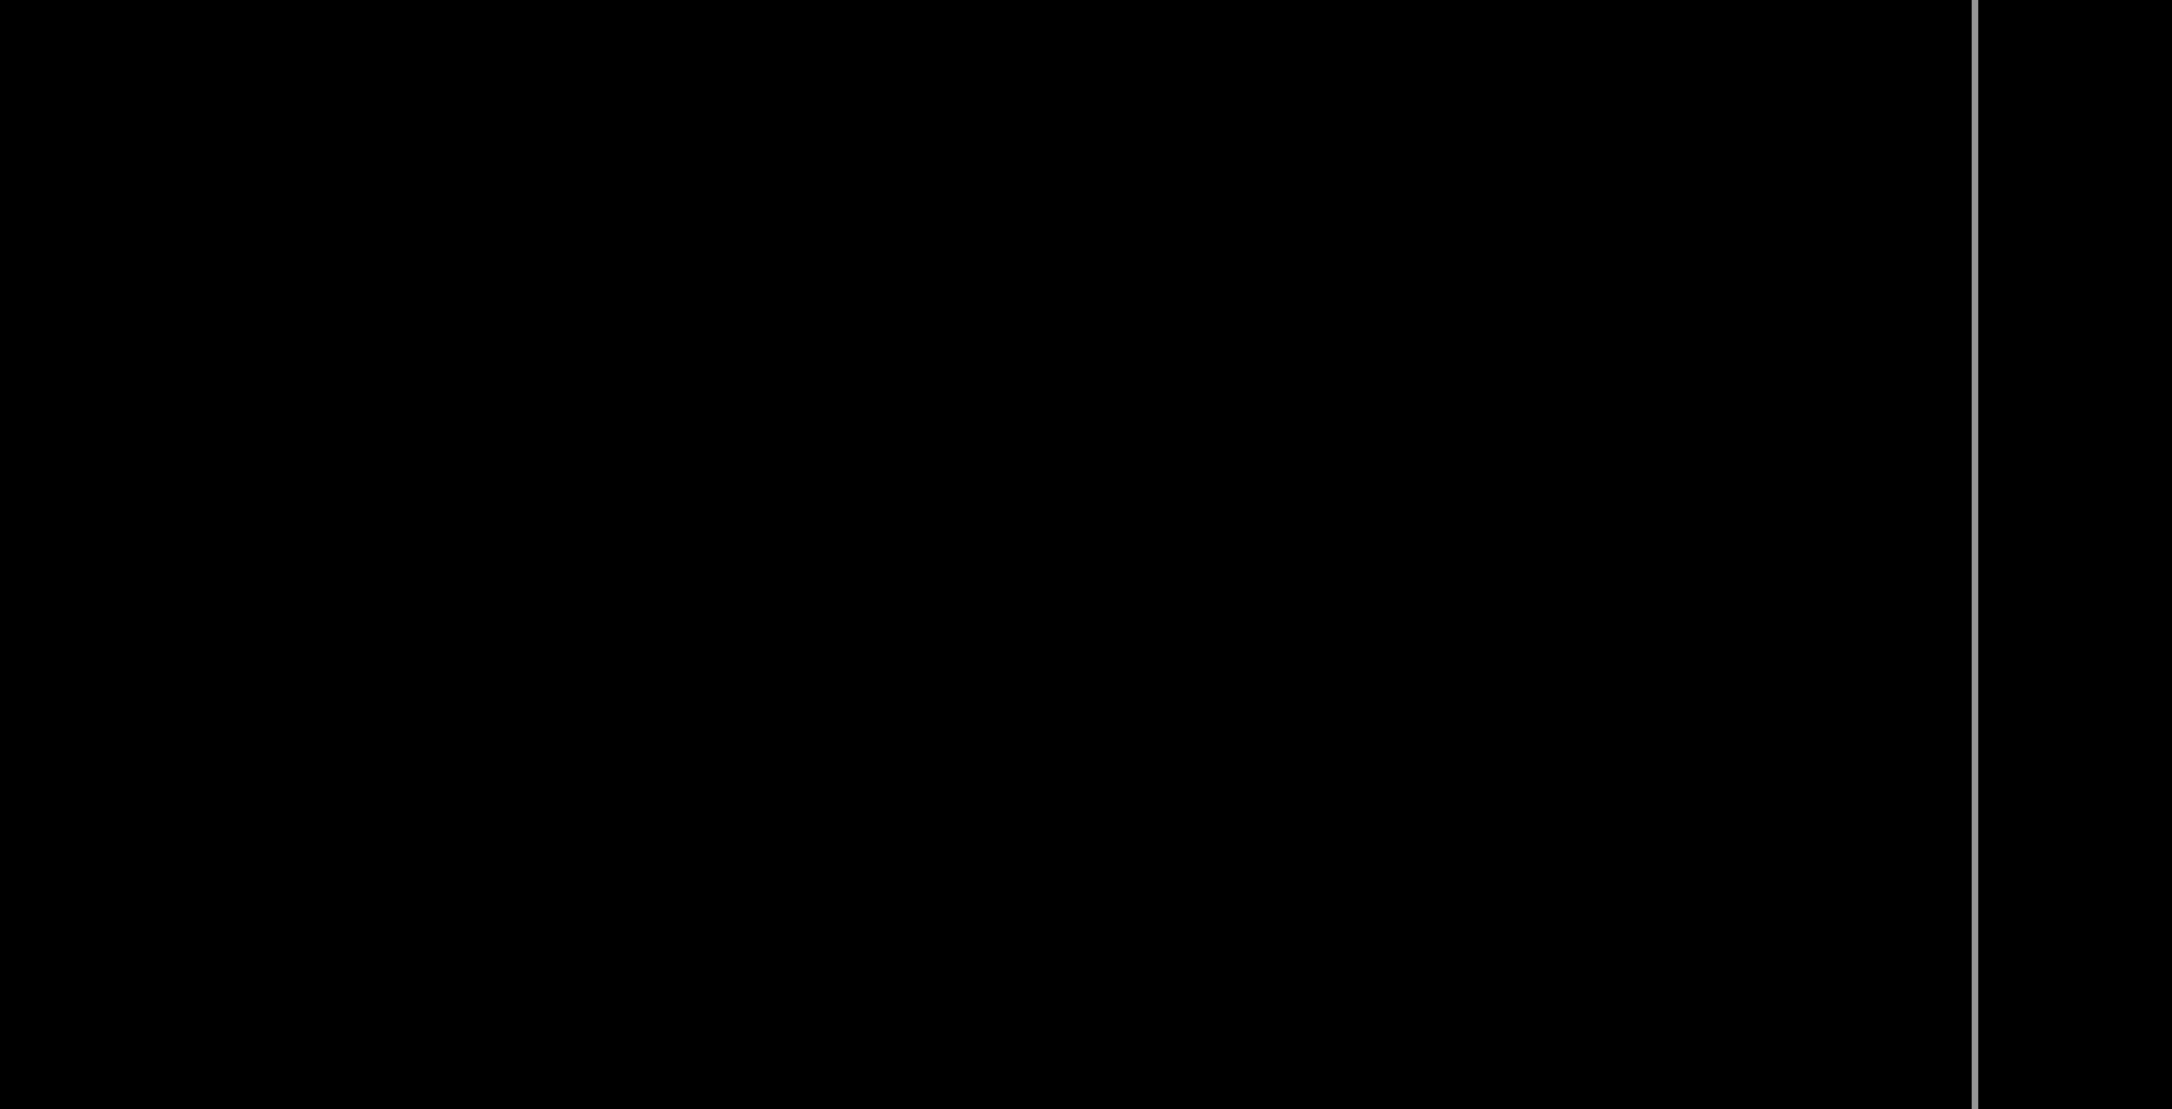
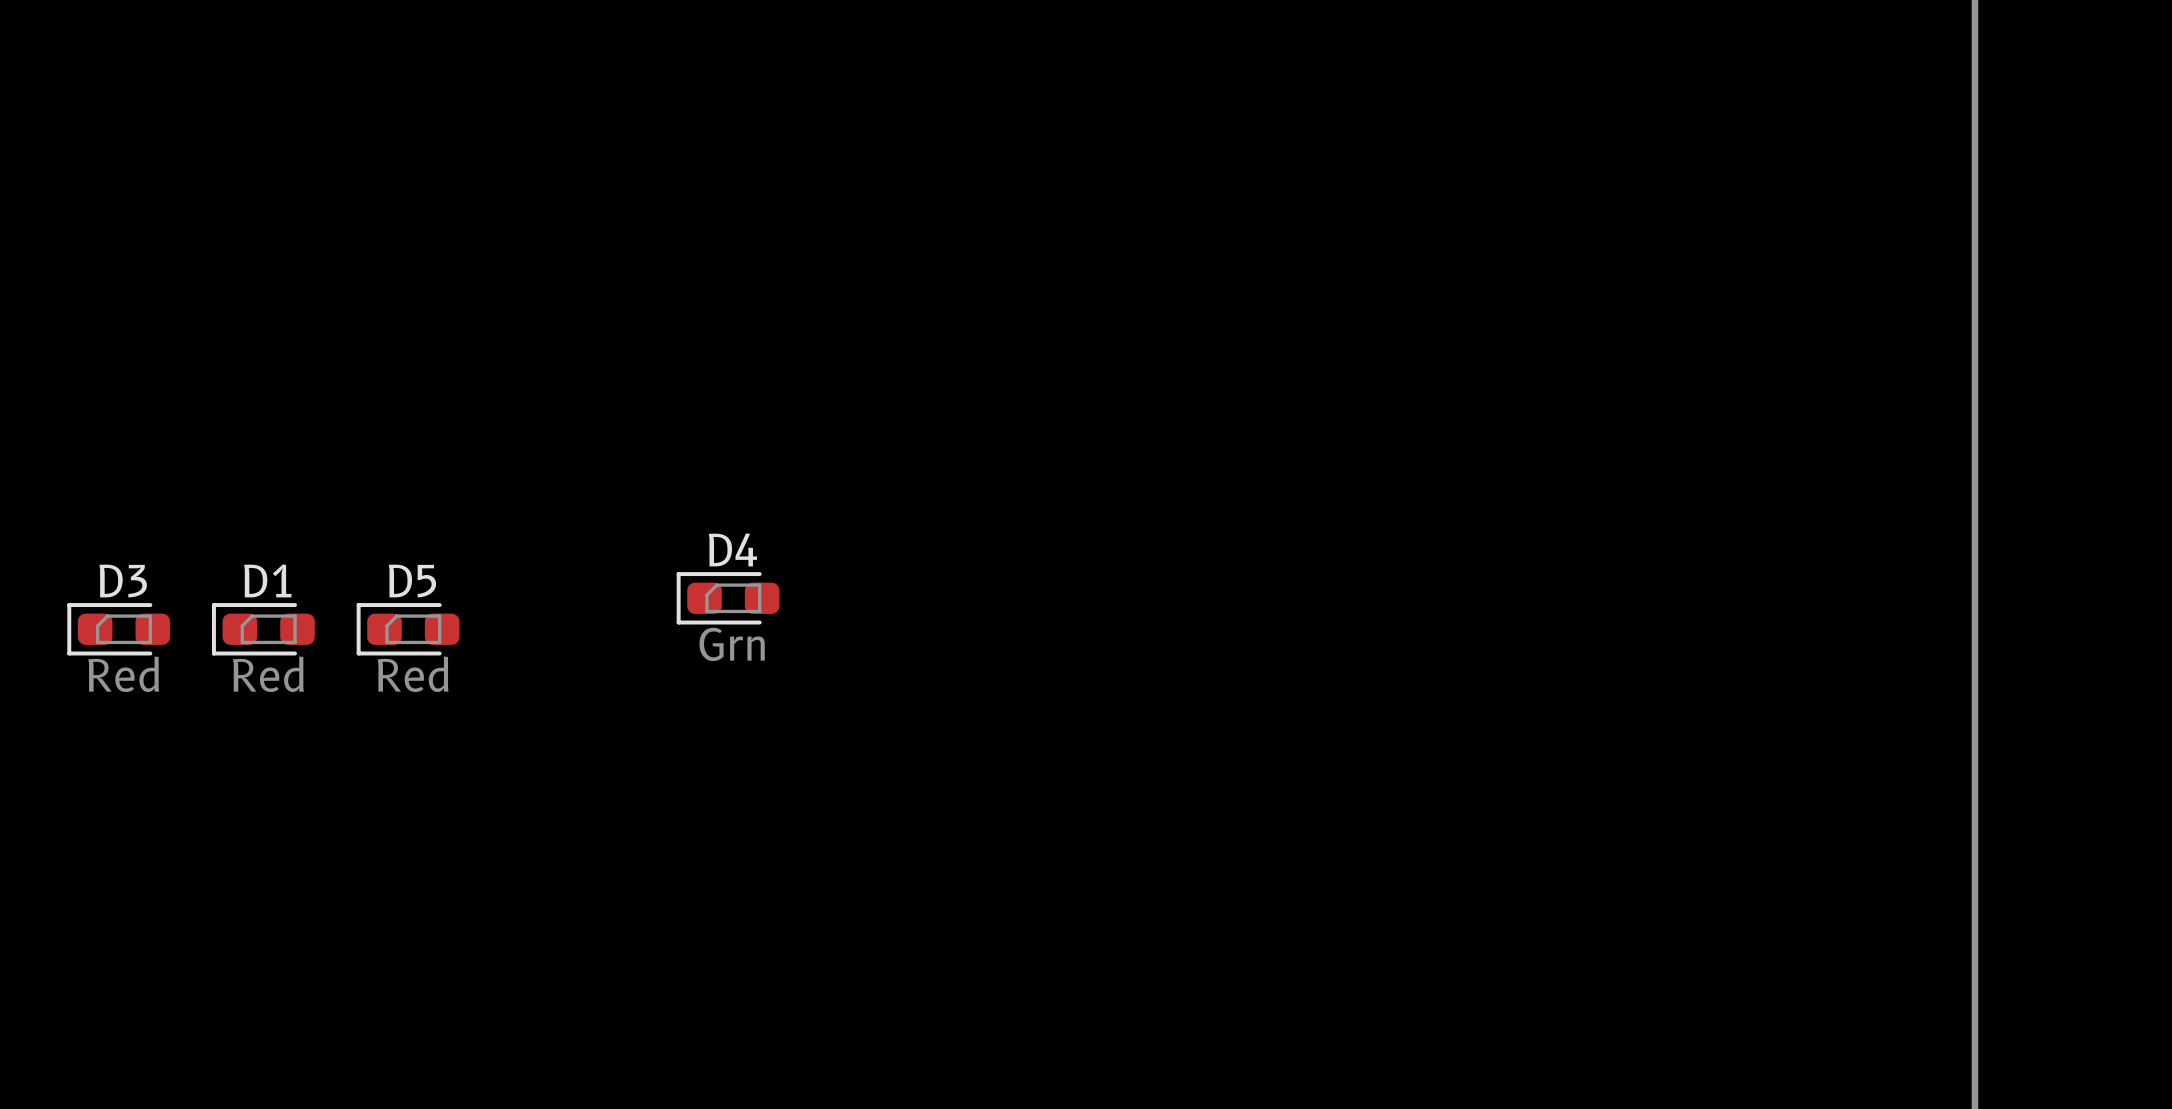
D4: none -> Grn (728, 598)
D3: none -> Red (118, 629)
D1: none -> Red (263, 629)
D5: none -> Red (408, 629)

